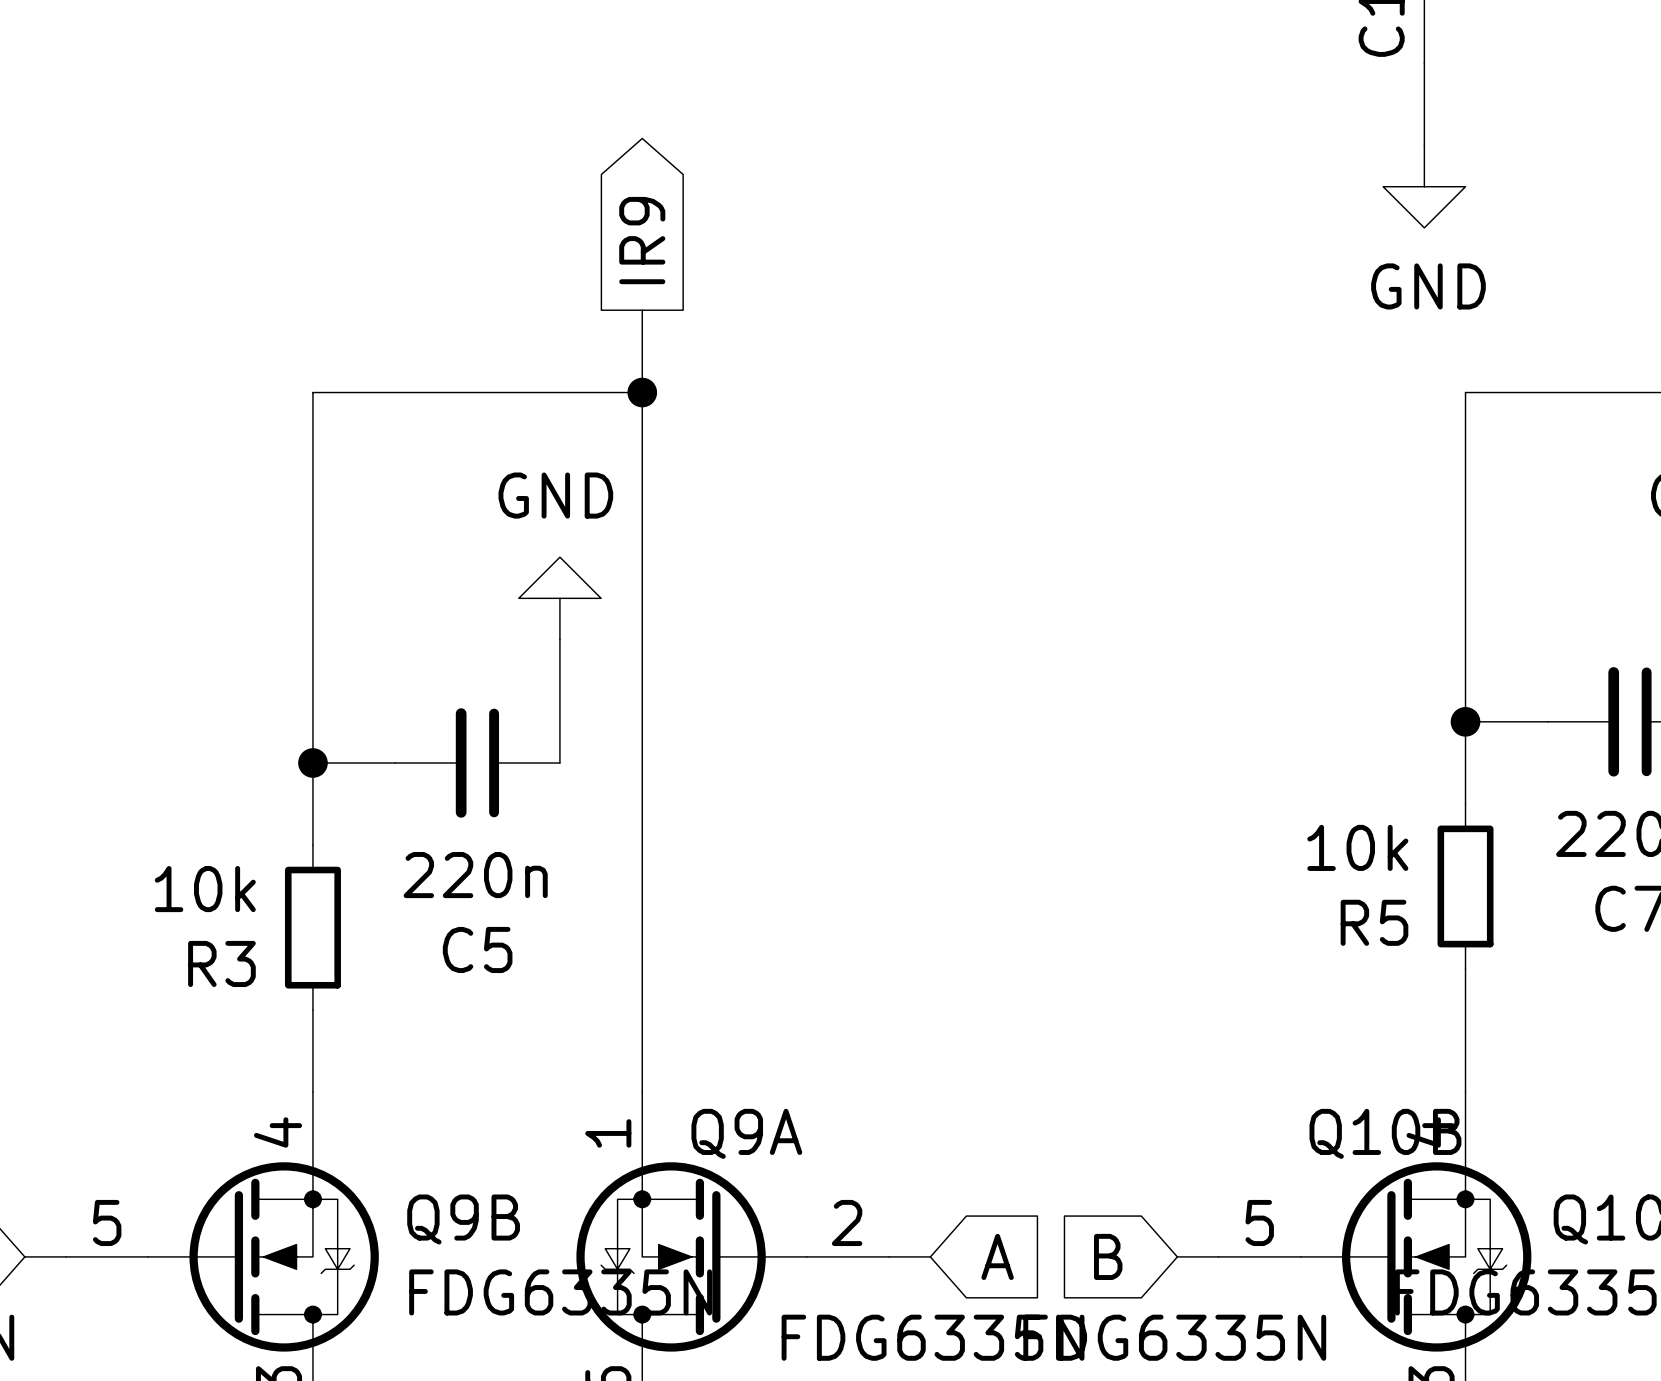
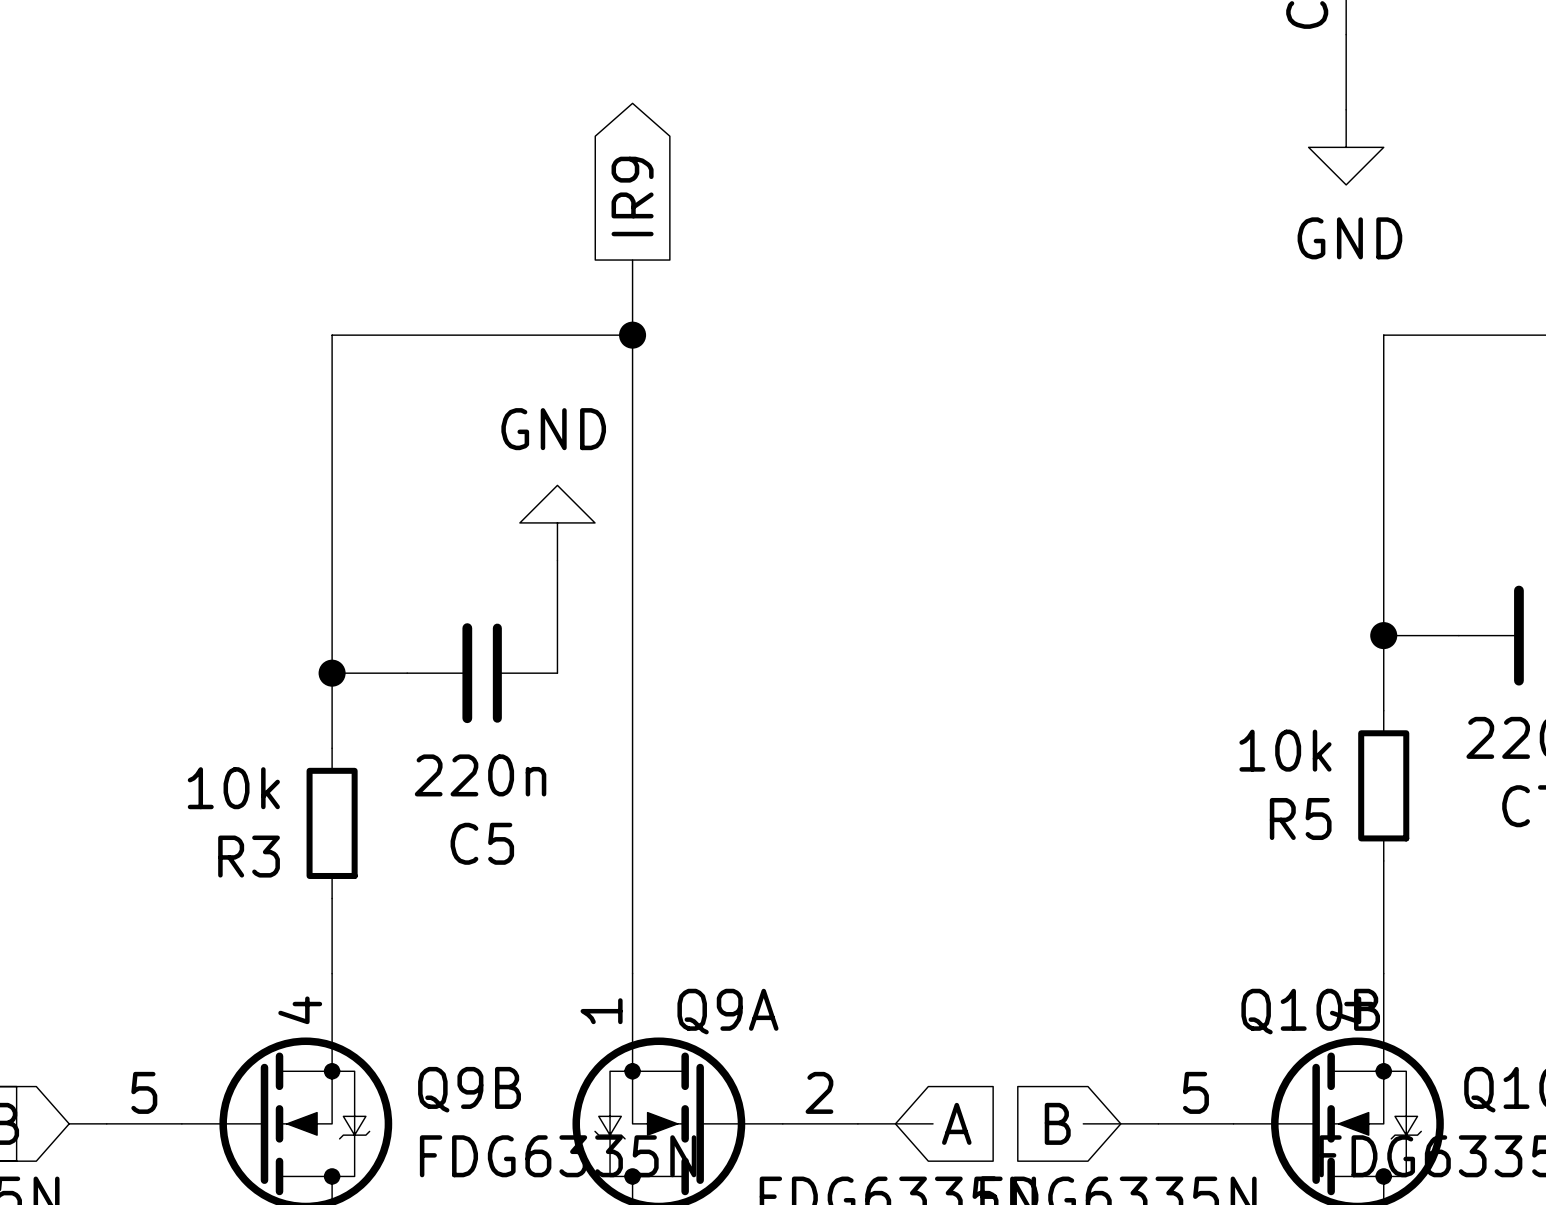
wire: none -> (895, 1123) (933, 1123)
wire: none -> (1083, 1123) (1120, 1123)

